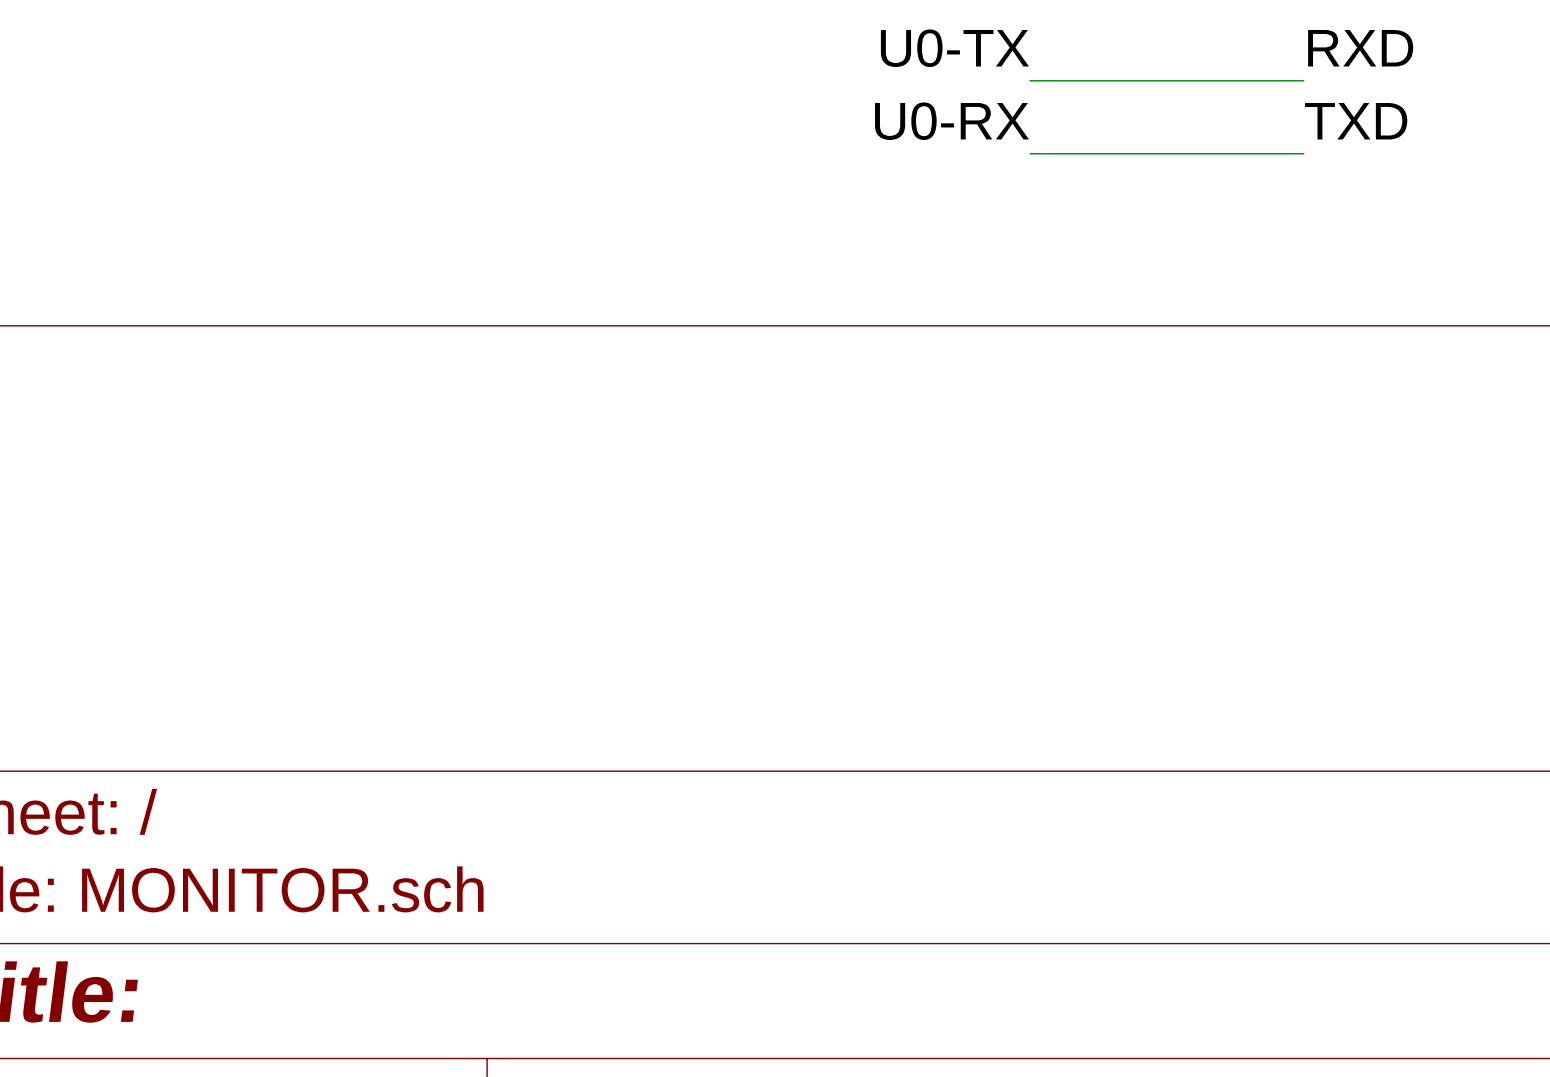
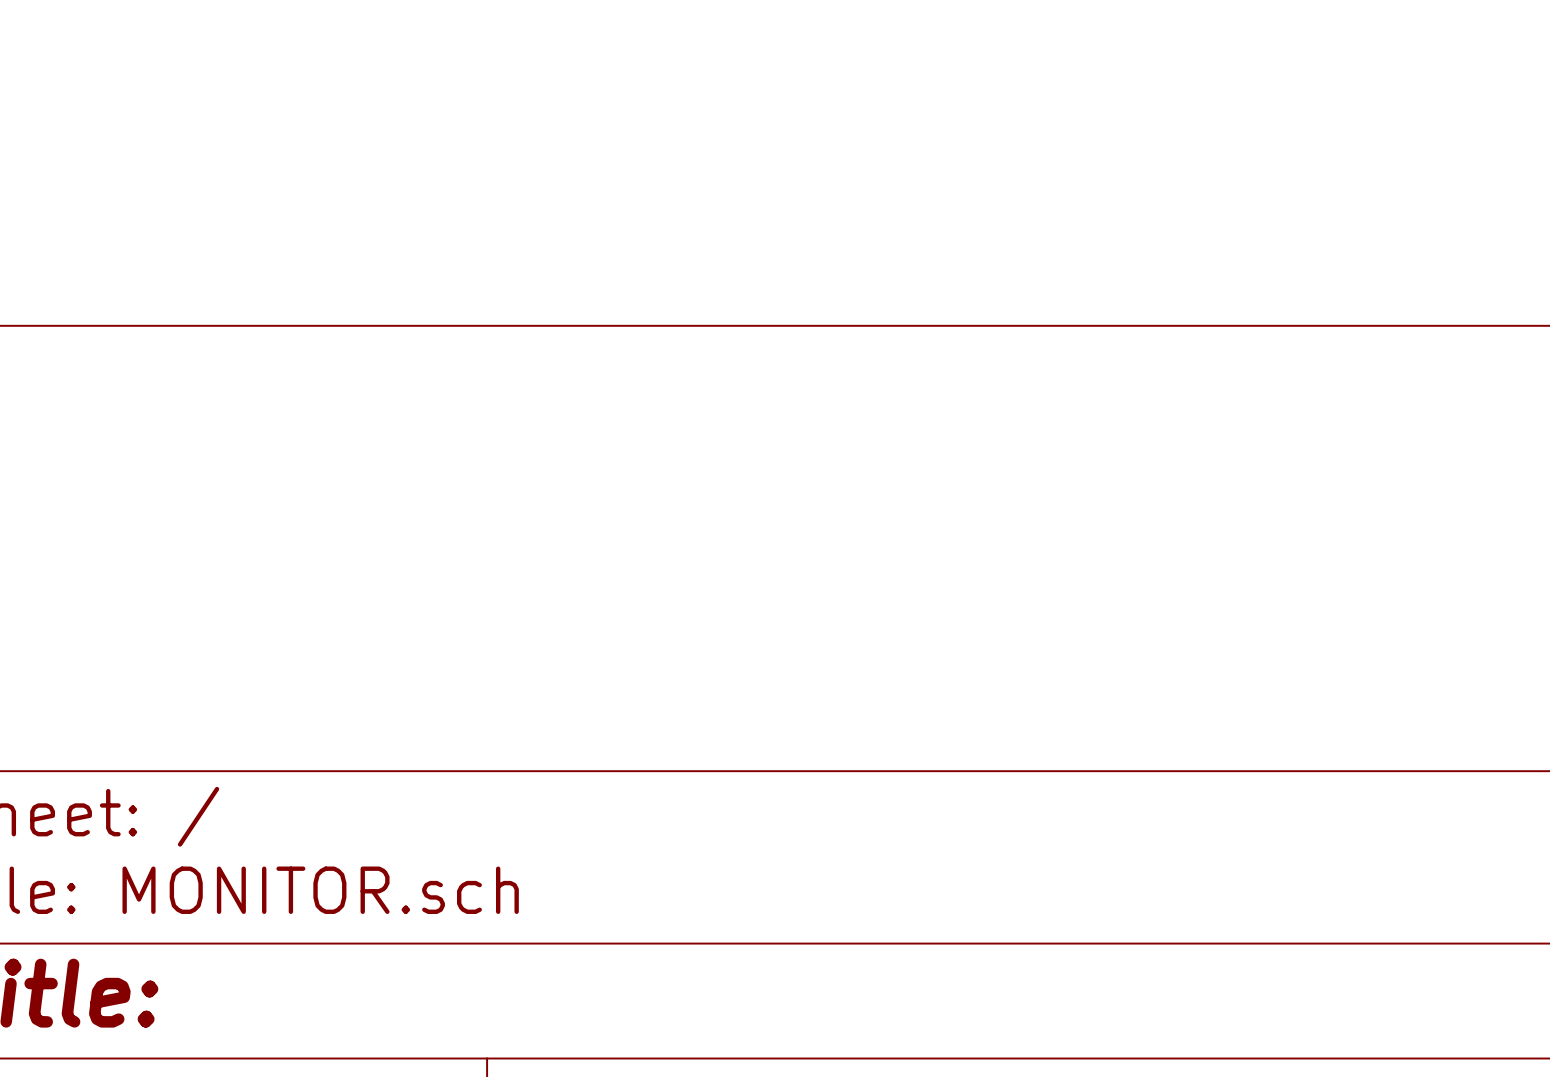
label: U0-TX (954, 48) -> none
label: RXD (1360, 48) -> none
wire: (1030, 80) (1303, 80) -> none
label: U0-RX (951, 121) -> none
label: TXD (1356, 121) -> none
wire: (1030, 153) (1303, 153) -> none

